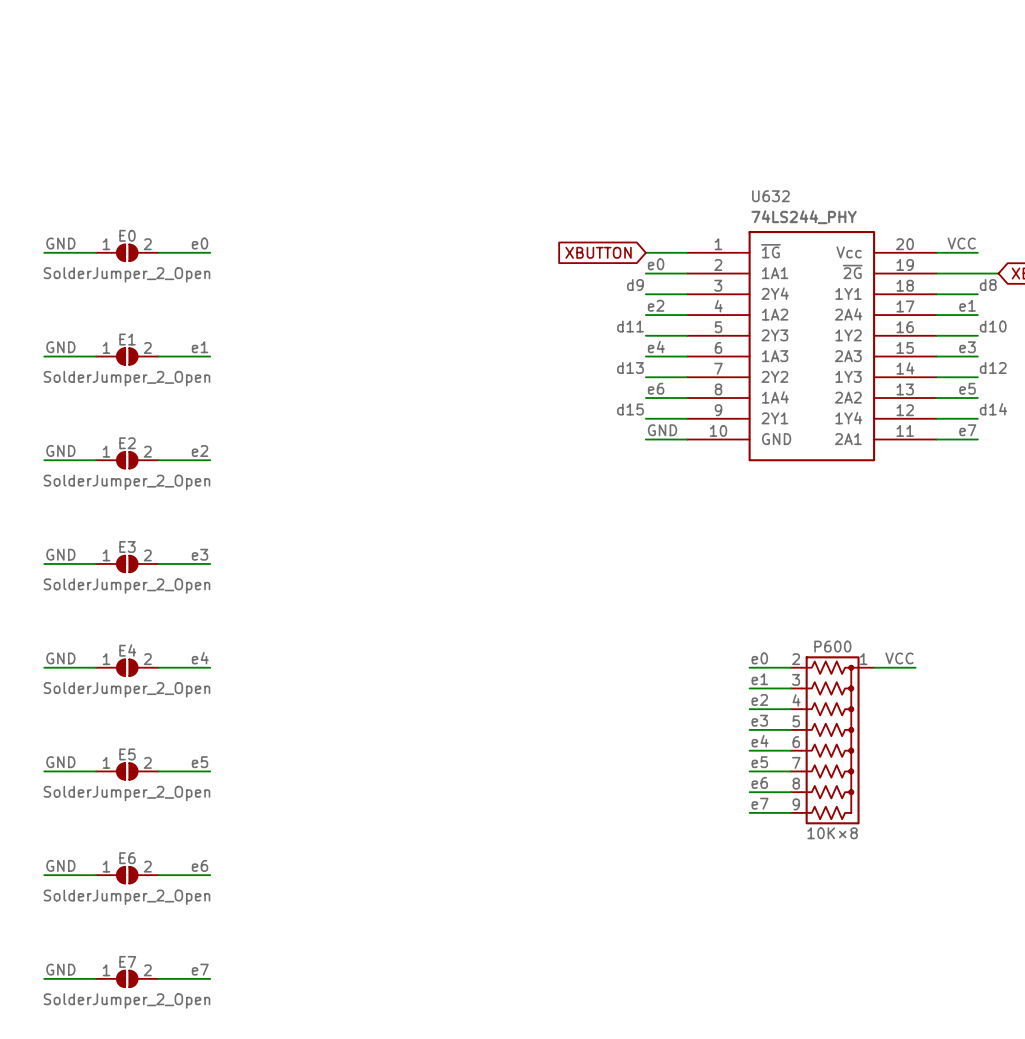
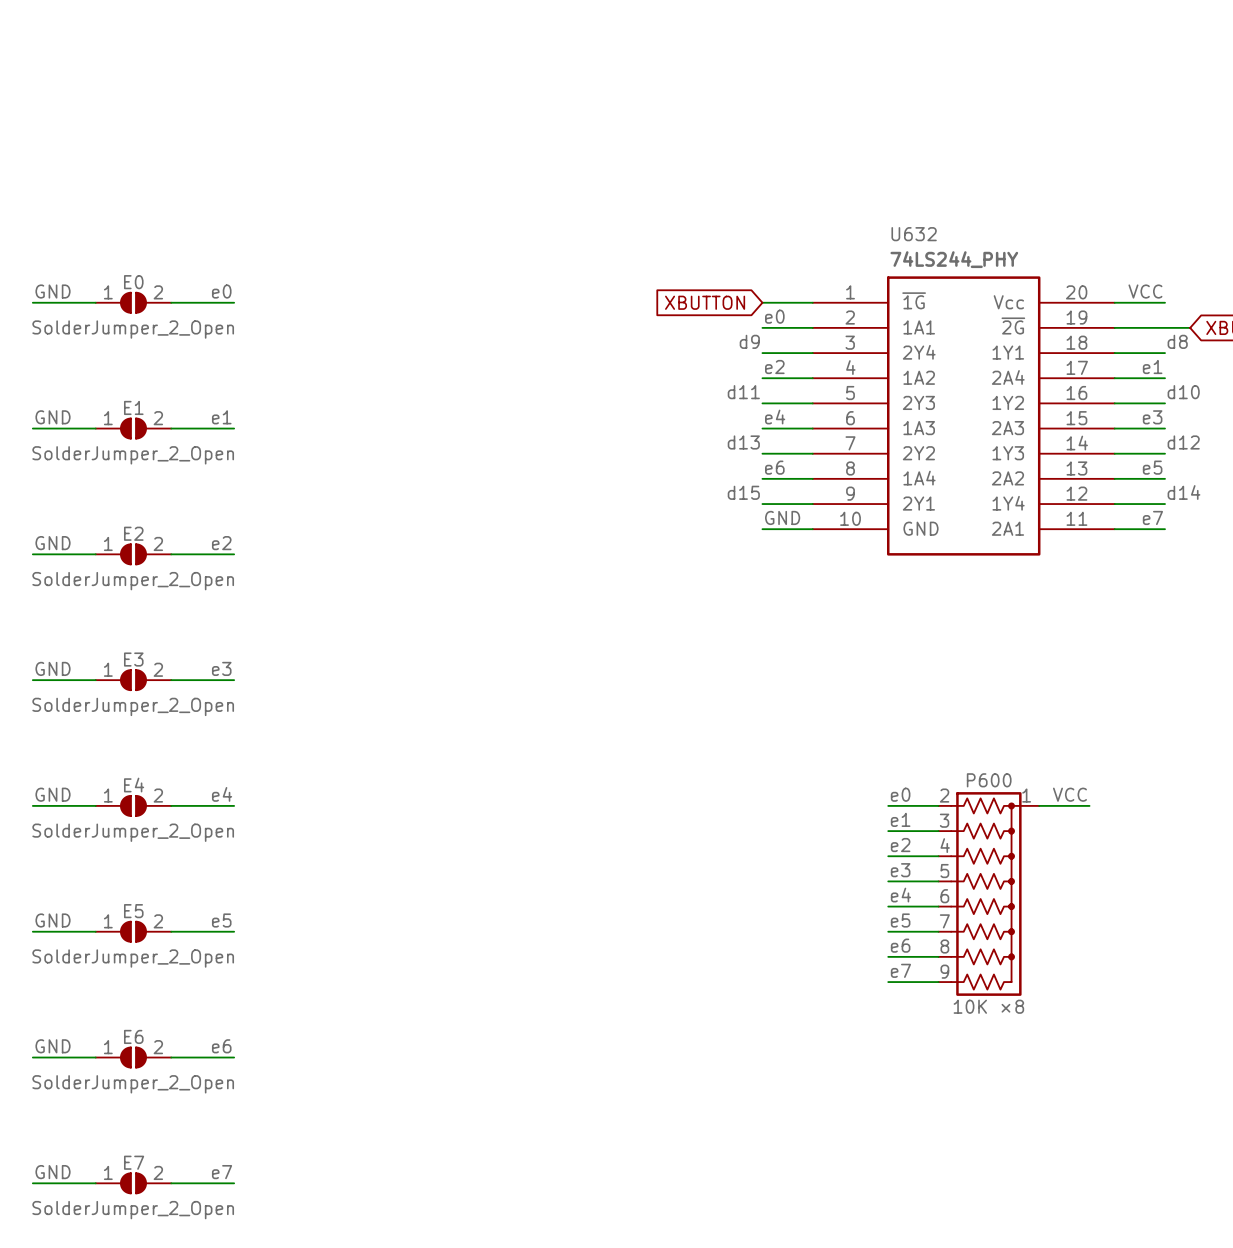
P600 value: 10K×8 (832, 833) -> 10K ×8 (988, 1006)

